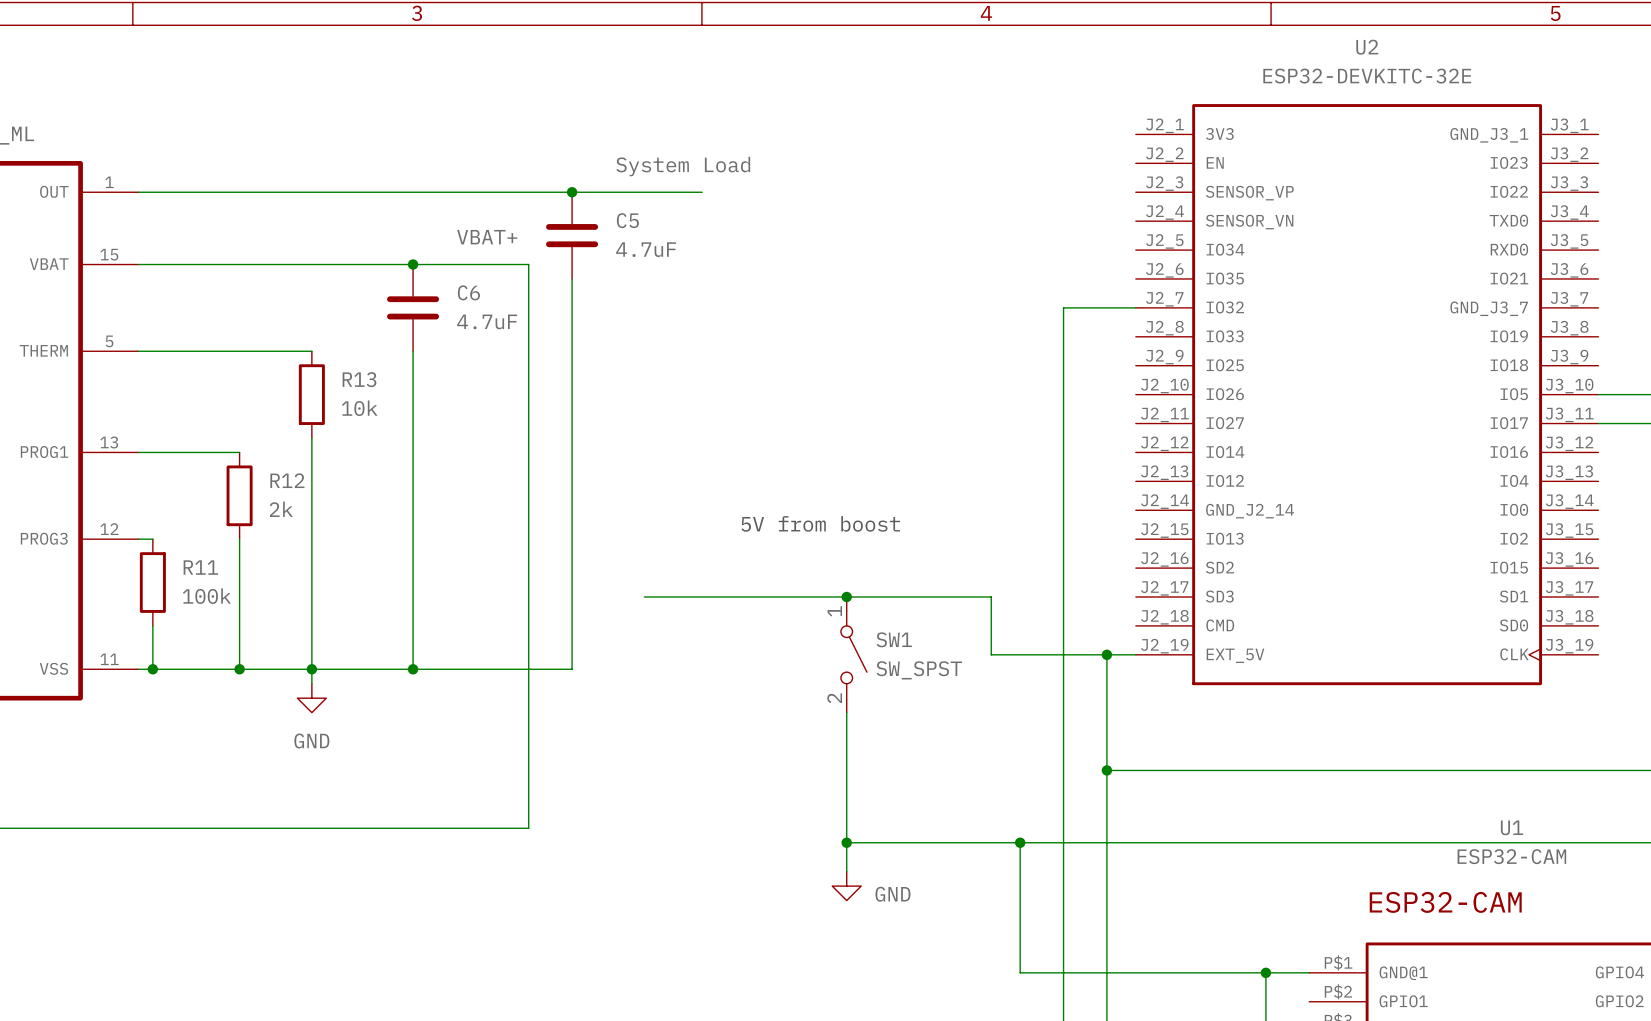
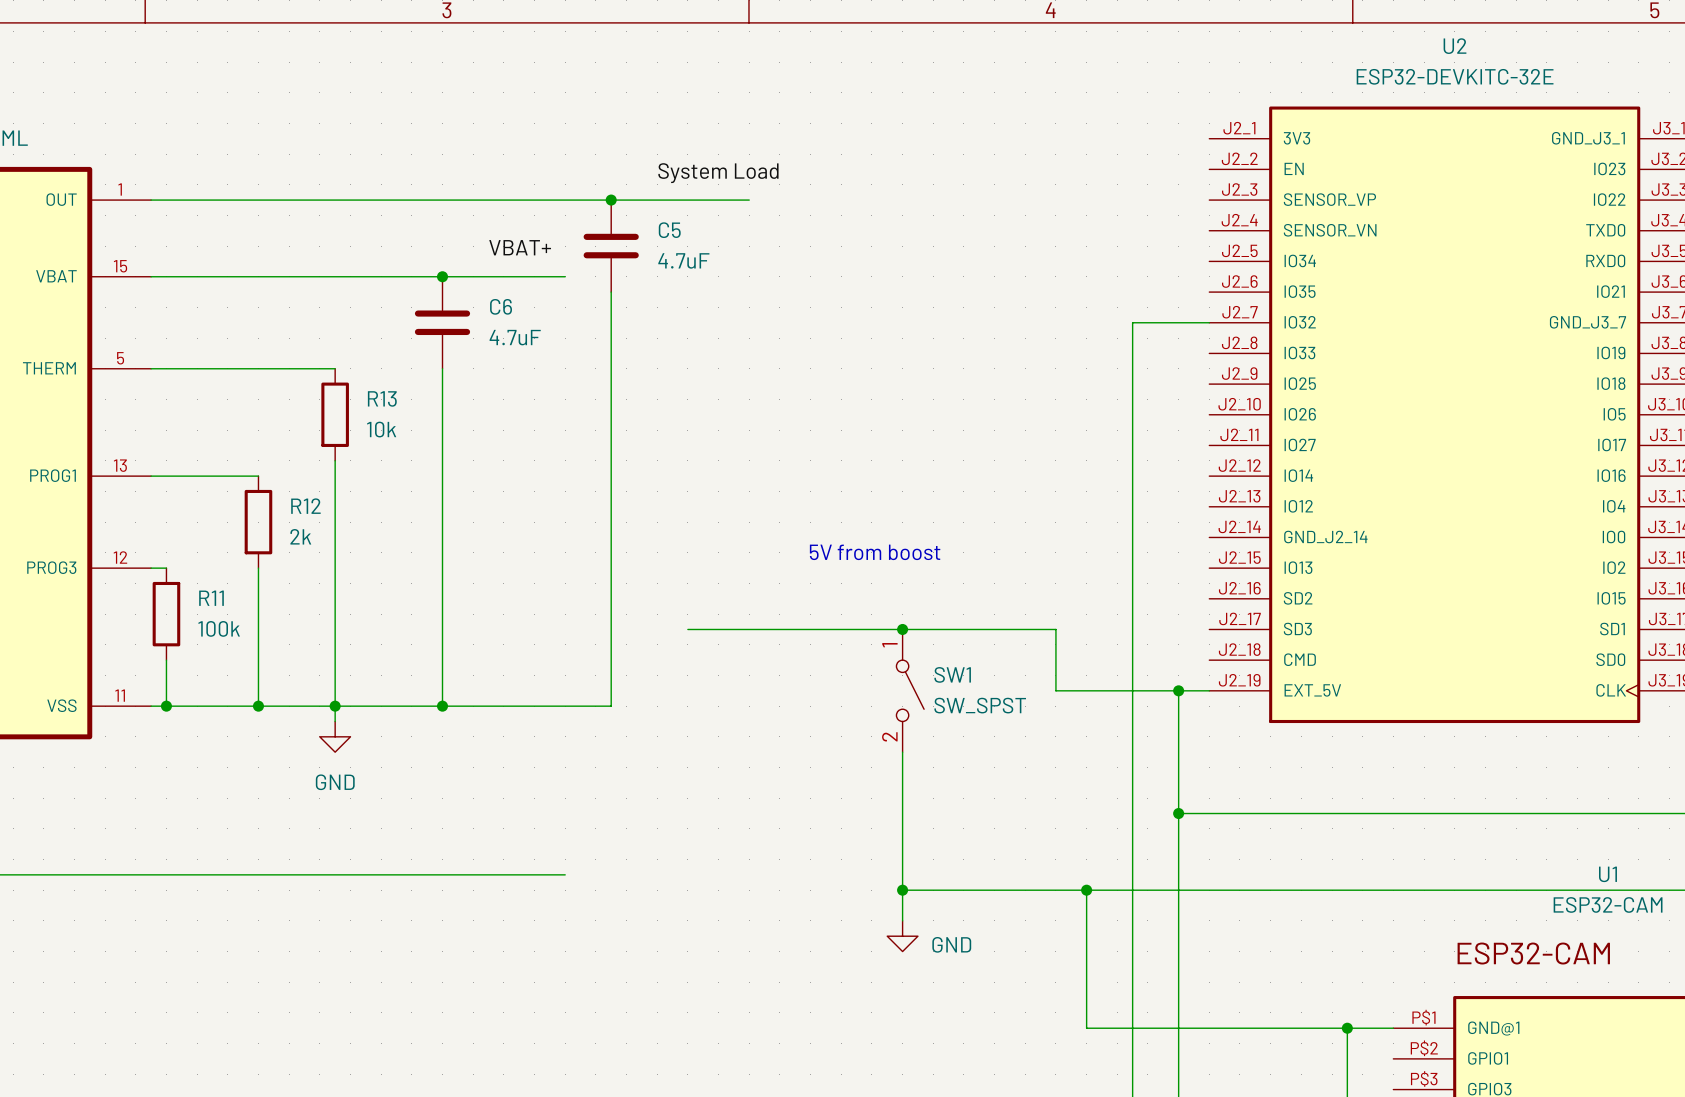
wire: (528, 264) (528, 828) -> none

